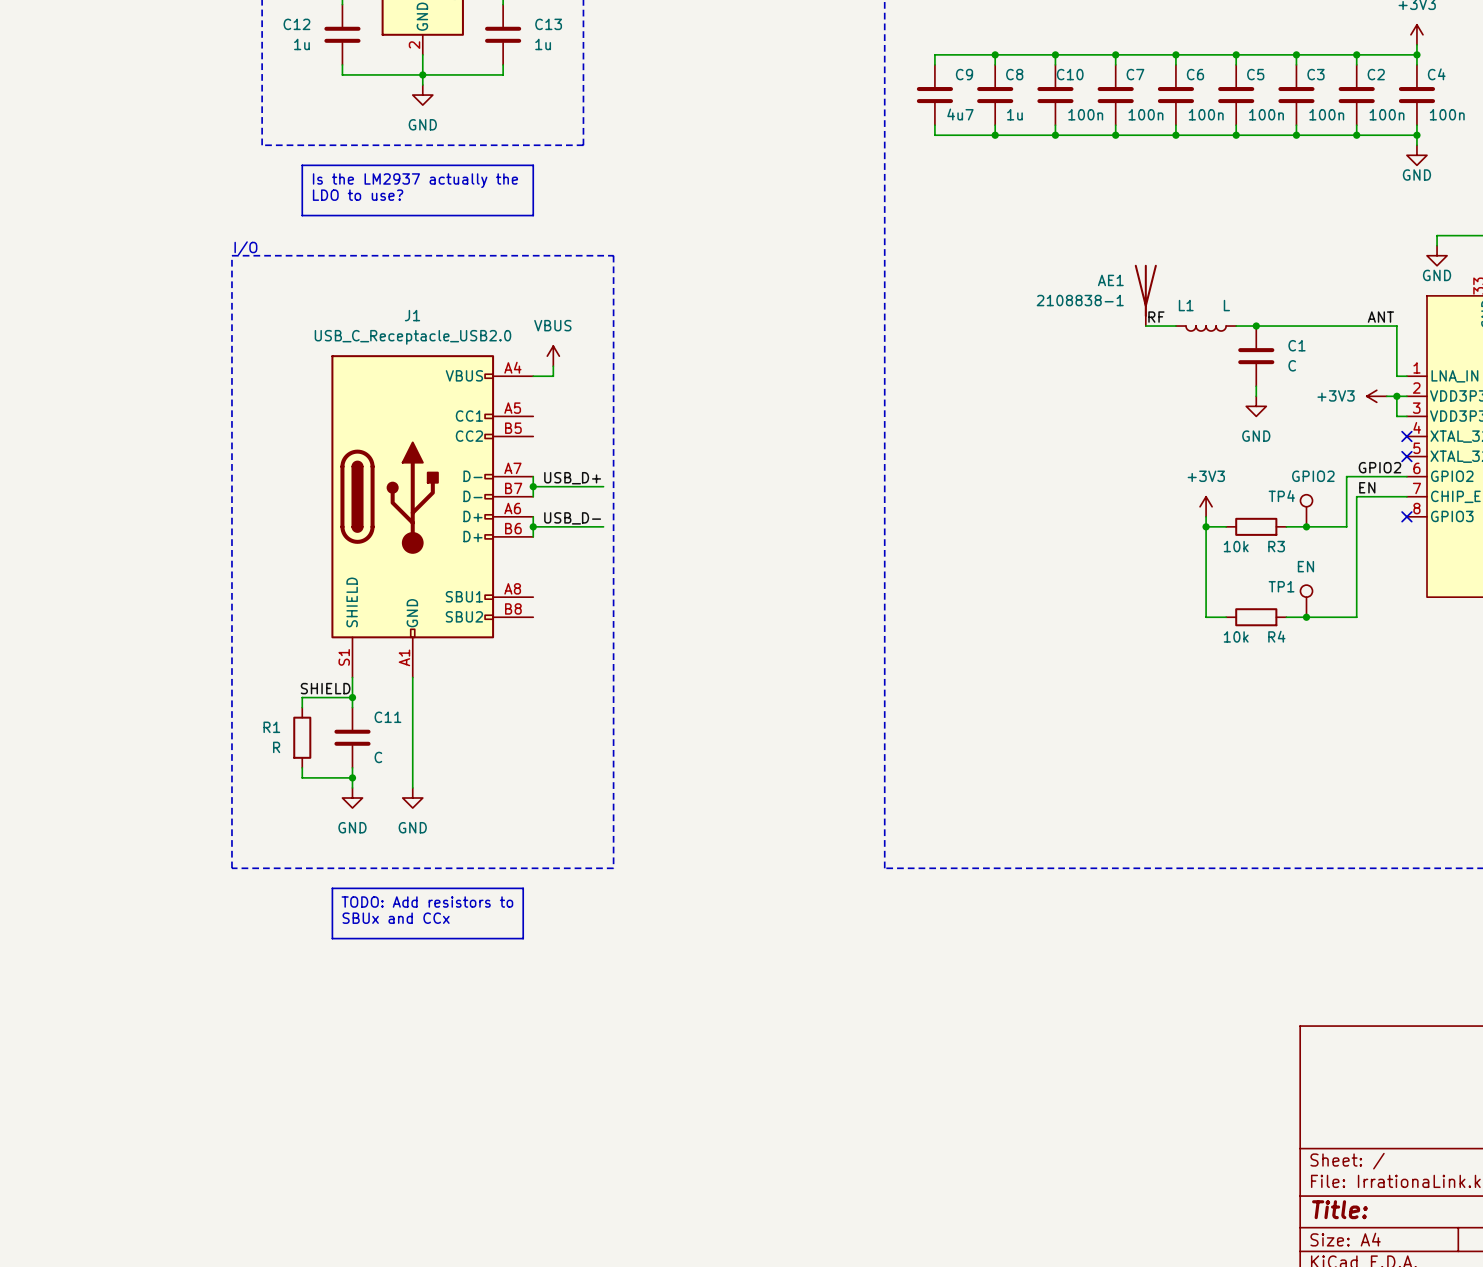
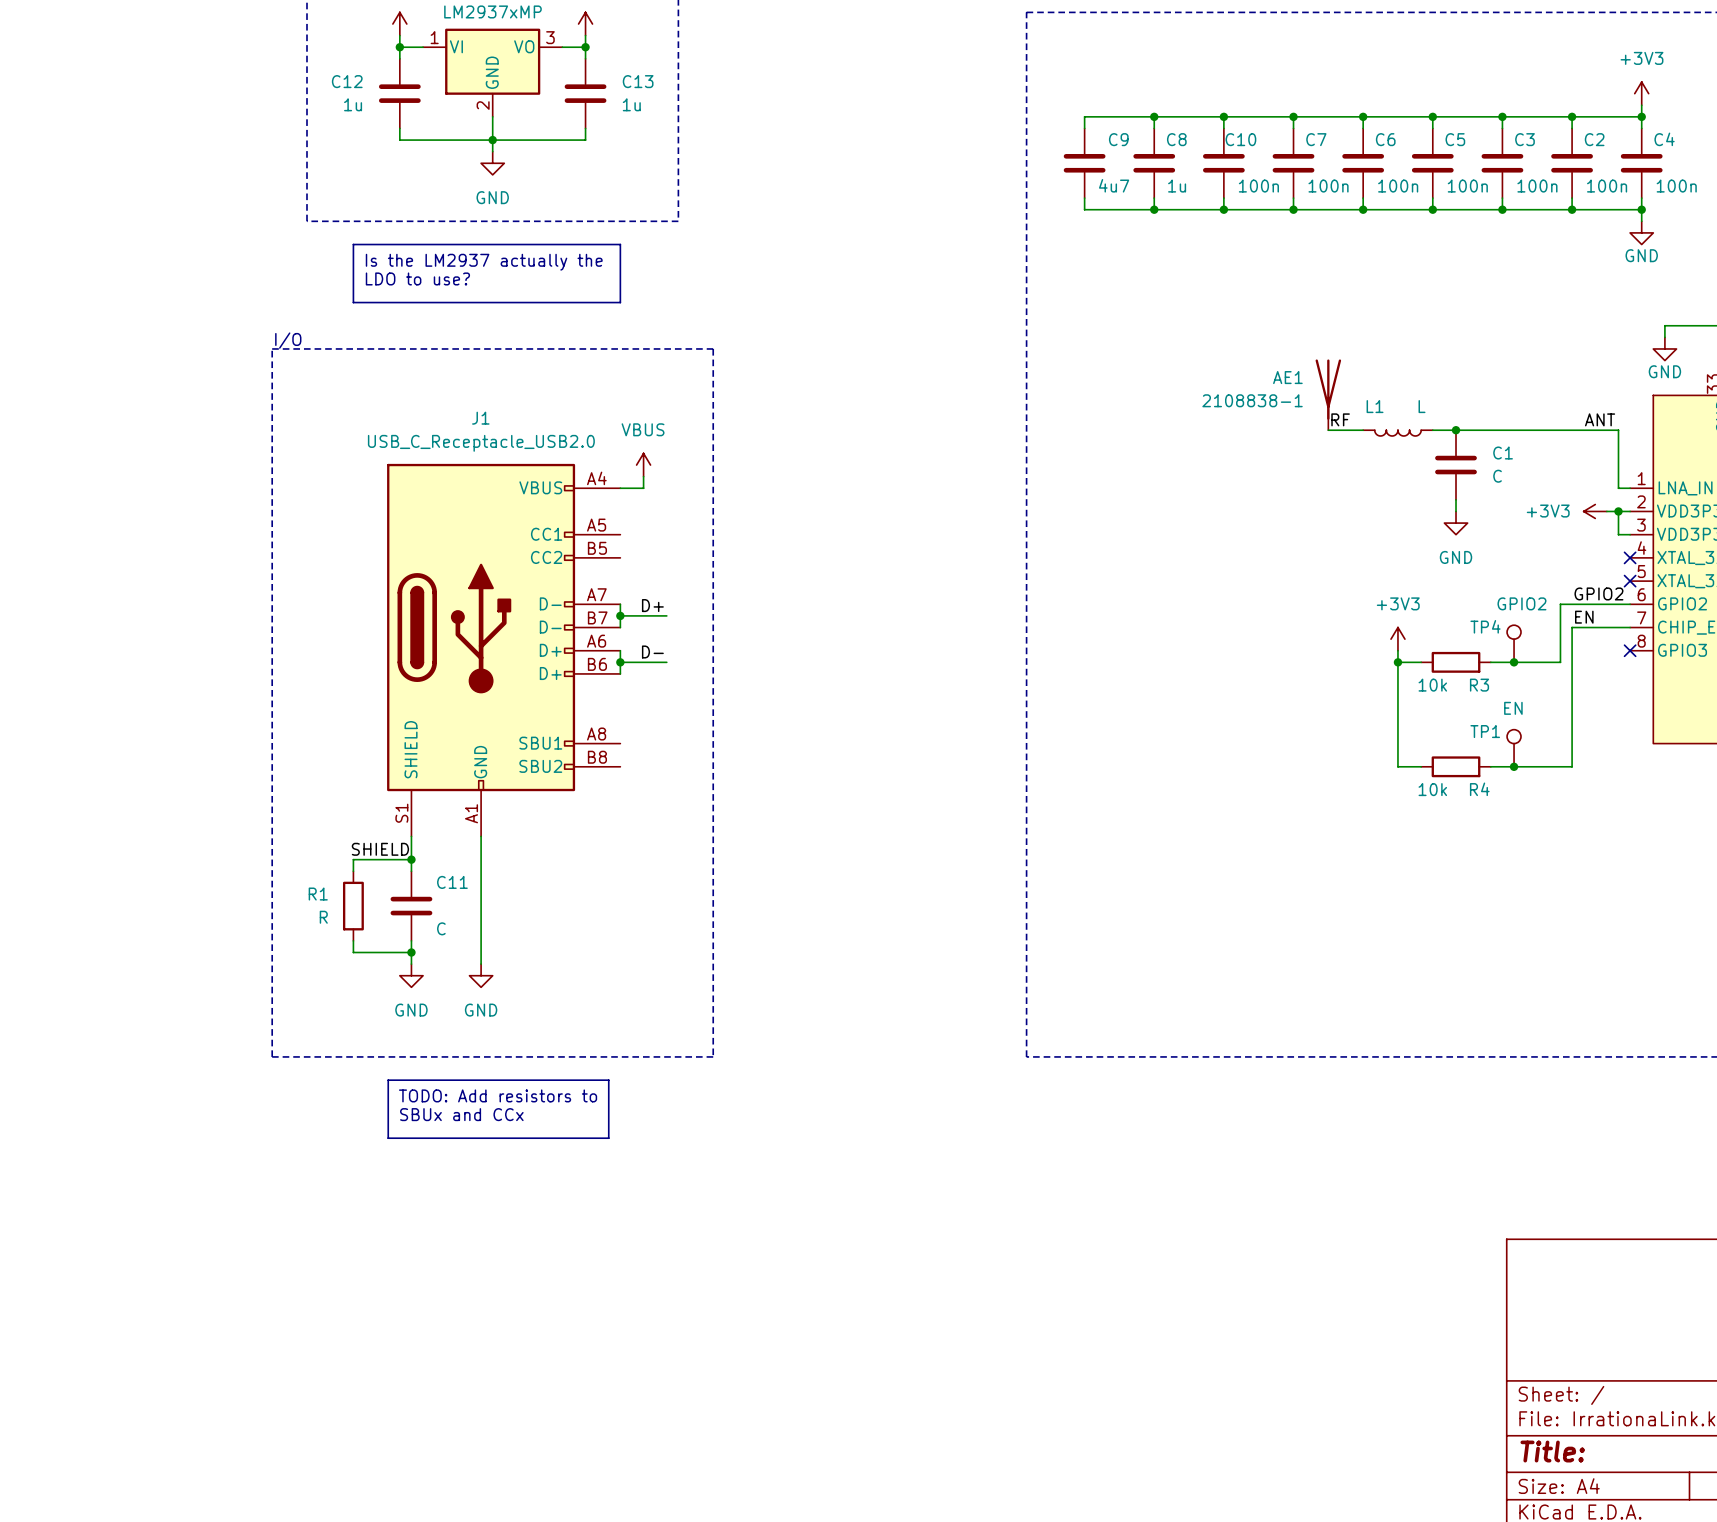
label: none -> D+ (652, 605)
label: USB_D+ (572, 478) -> none
wire: (573, 486) (603, 486) -> none
label: none -> D- (652, 651)
label: USB_D- (572, 518) -> none
wire: (573, 526) (603, 526) -> none

